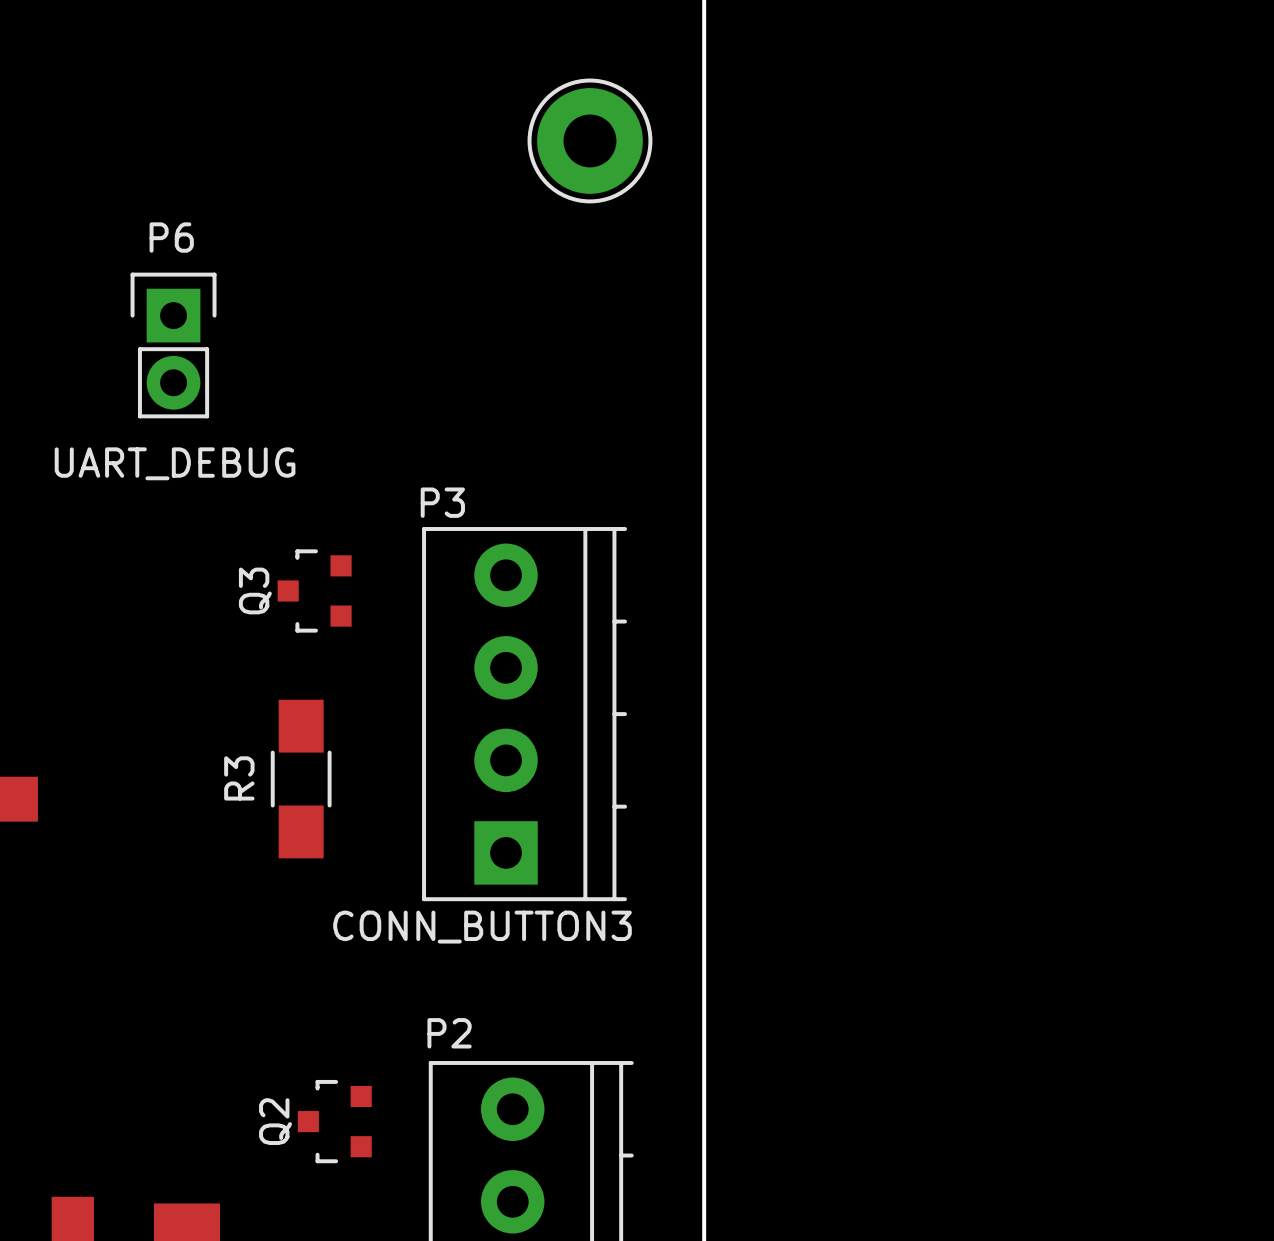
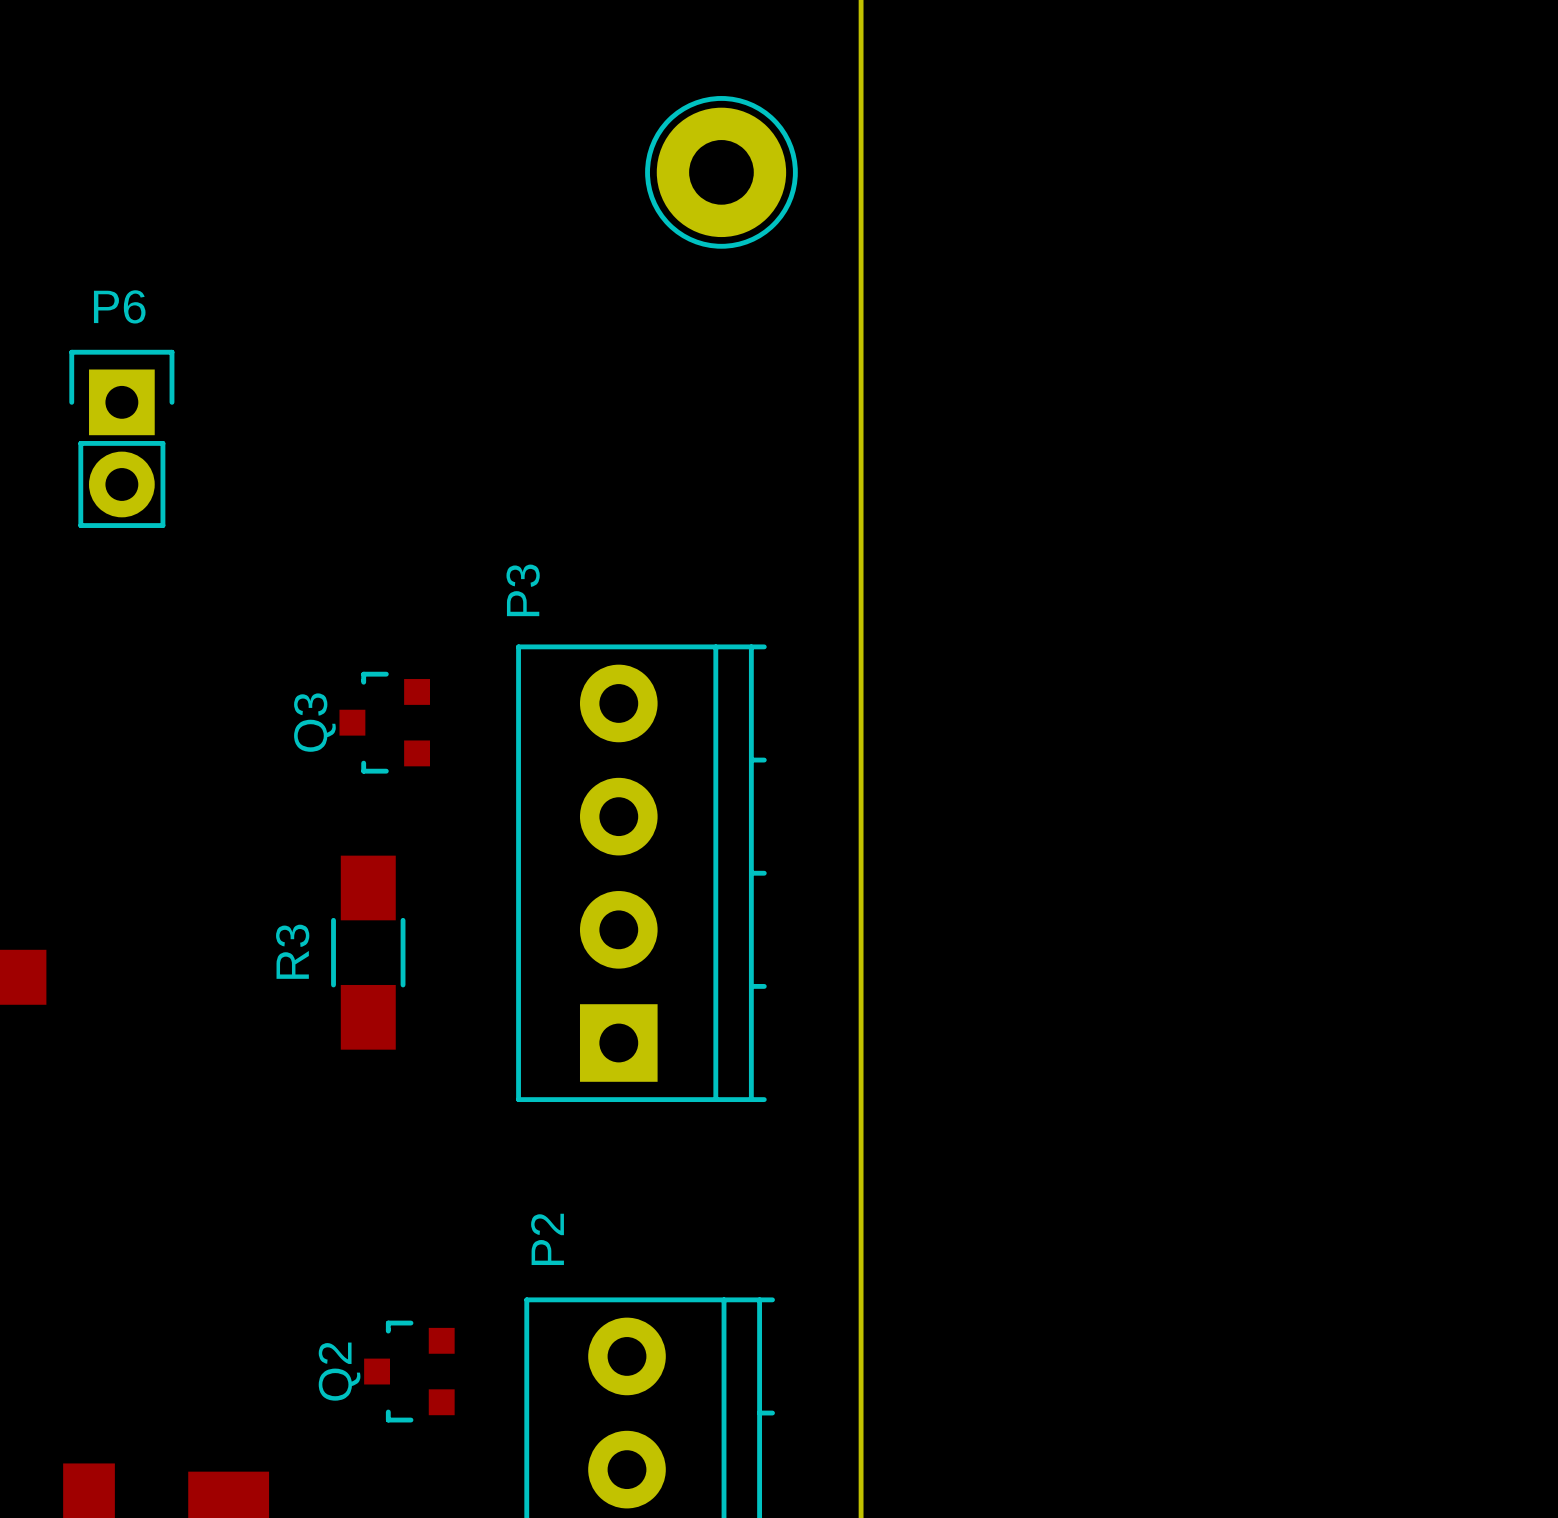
P6 position: (173, 345) -> (121, 438)
P6 value: UART_DEBUG (175, 463) -> none
P3 name rotation: 0° (442, 502) -> 90° counterclockwise (523, 590)
P3 value: CONN_BUTTON3 (482, 927) -> none
P2 name rotation: 0° (449, 1033) -> 90° counterclockwise (547, 1239)

